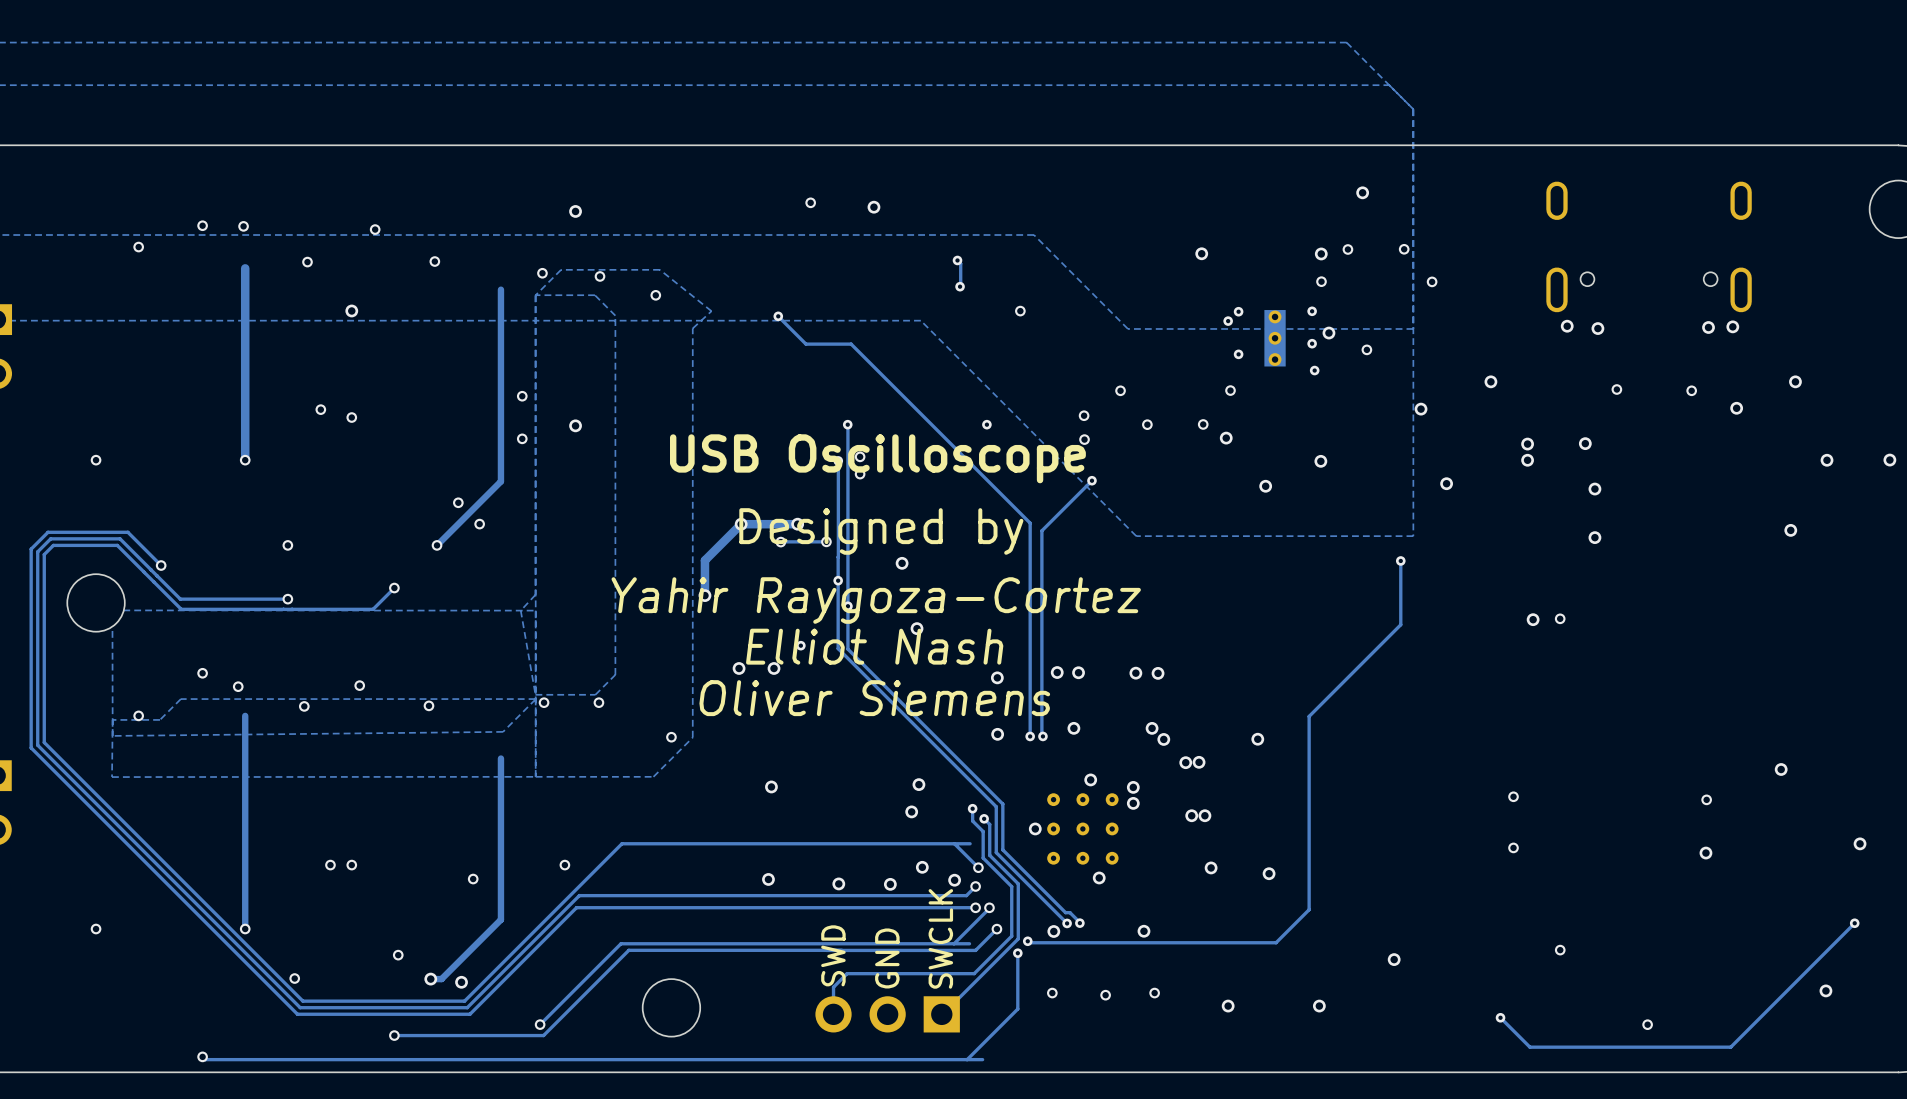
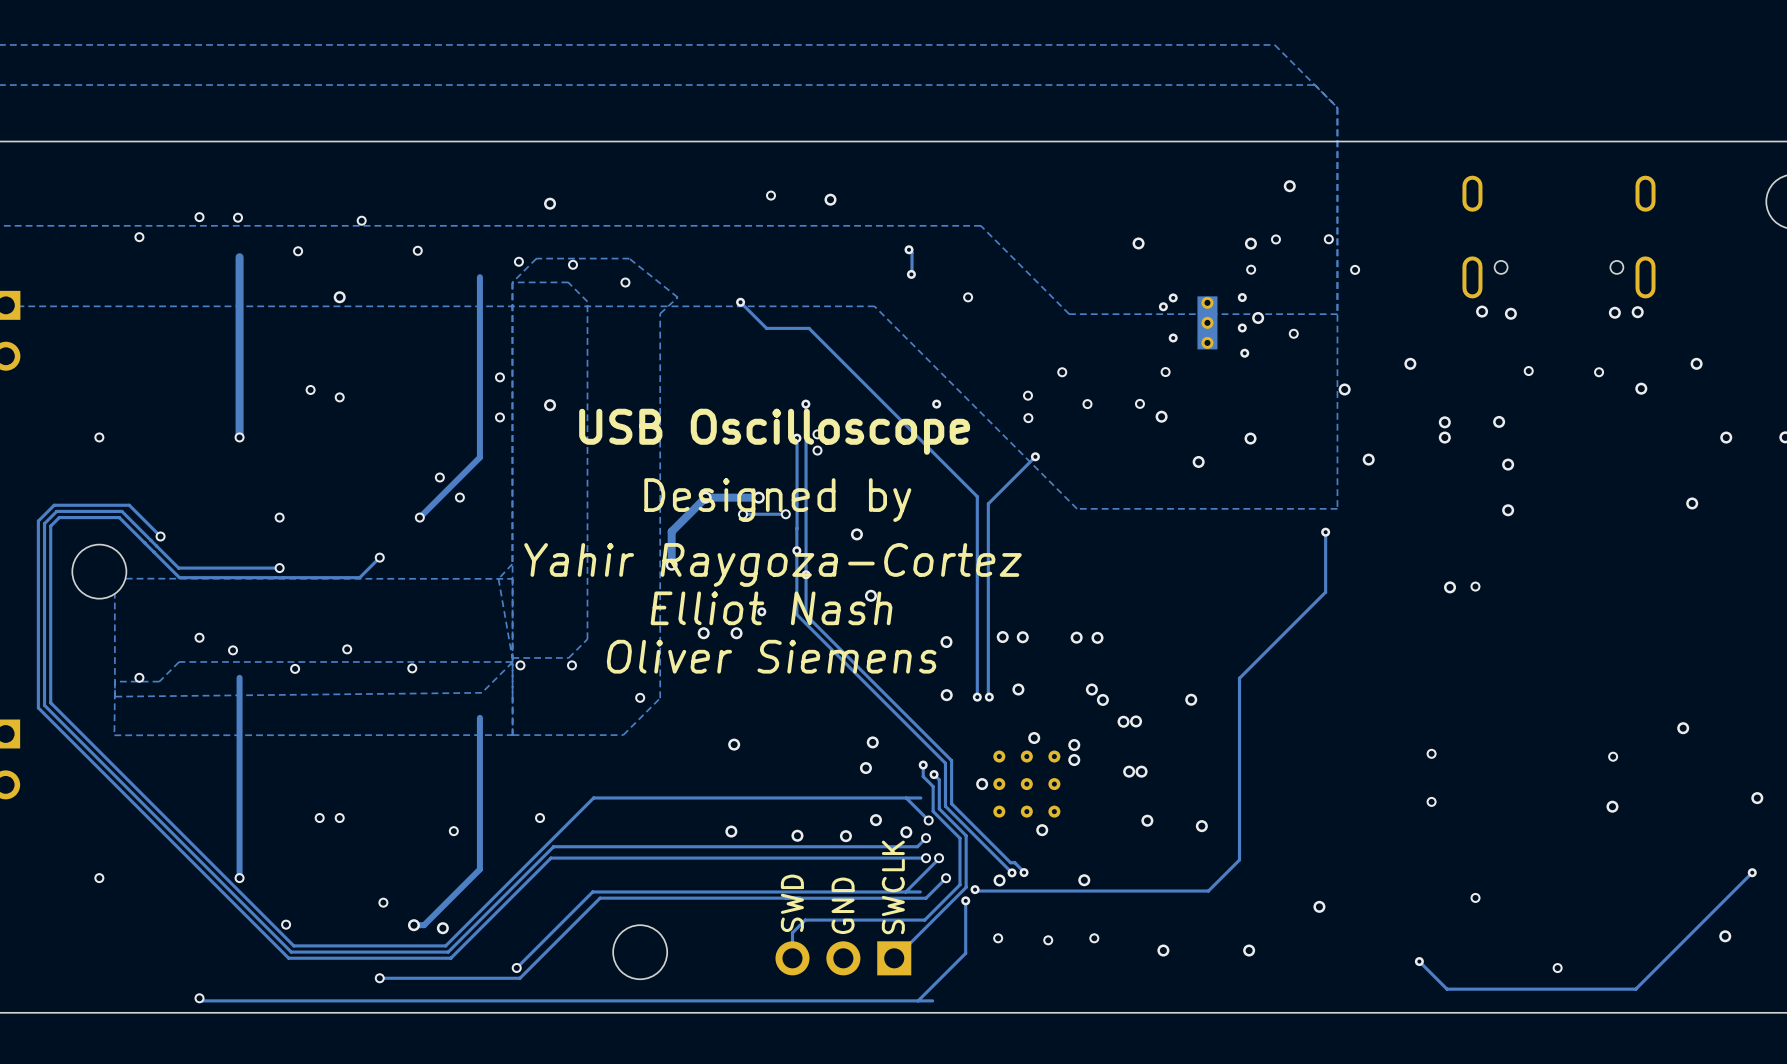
text position: USB Oscilloscope (877, 458) -> USB Oscilloscope (774, 431)
text position: Designed by (881, 531) -> Designed by (777, 500)
text position: Yahir Raygoza-Cortez (876, 600) -> Yahir Raygoza-Cortez (772, 564)
text position: Elliot Nash (874, 646) -> Elliot Nash (771, 608)
text position: Oliver Siemens (874, 698) -> Oliver Siemens (771, 656)

